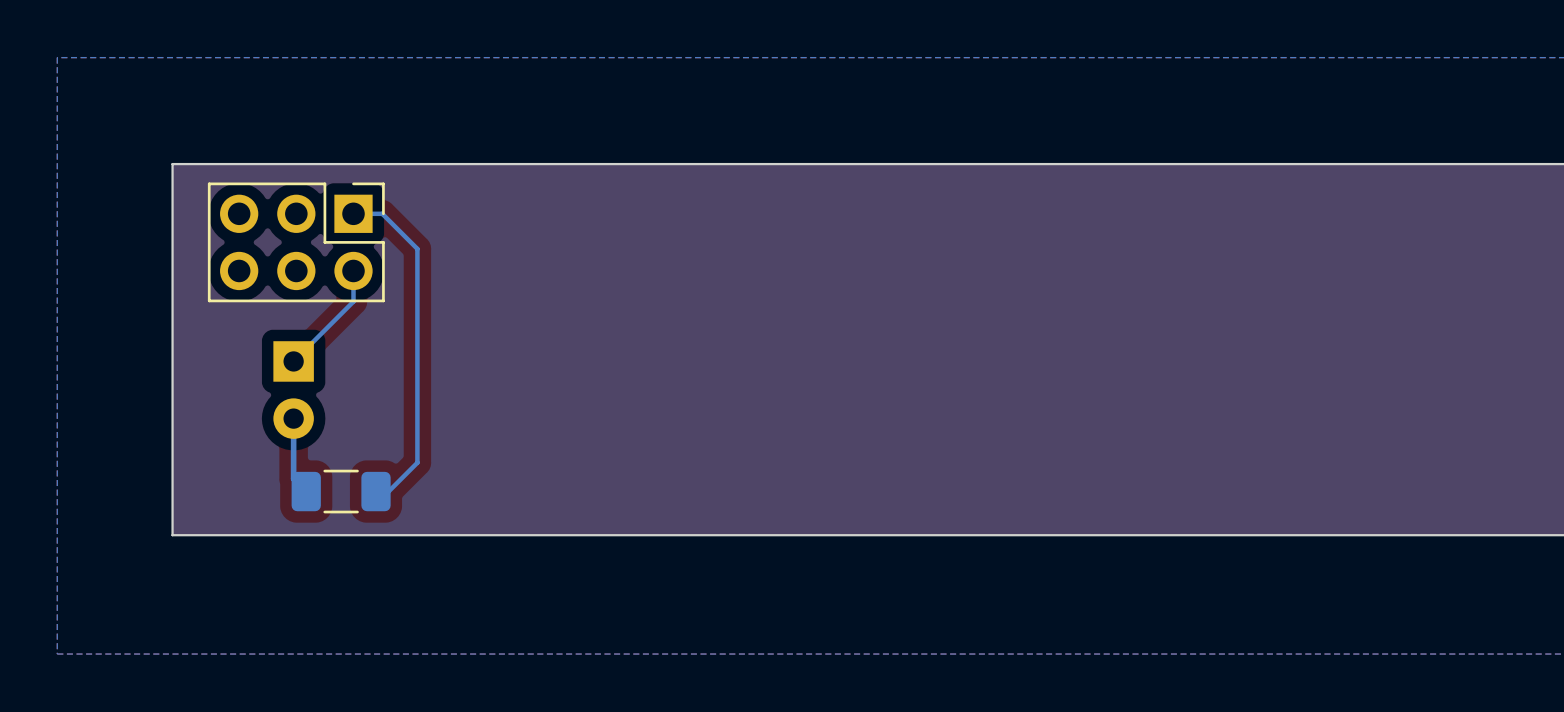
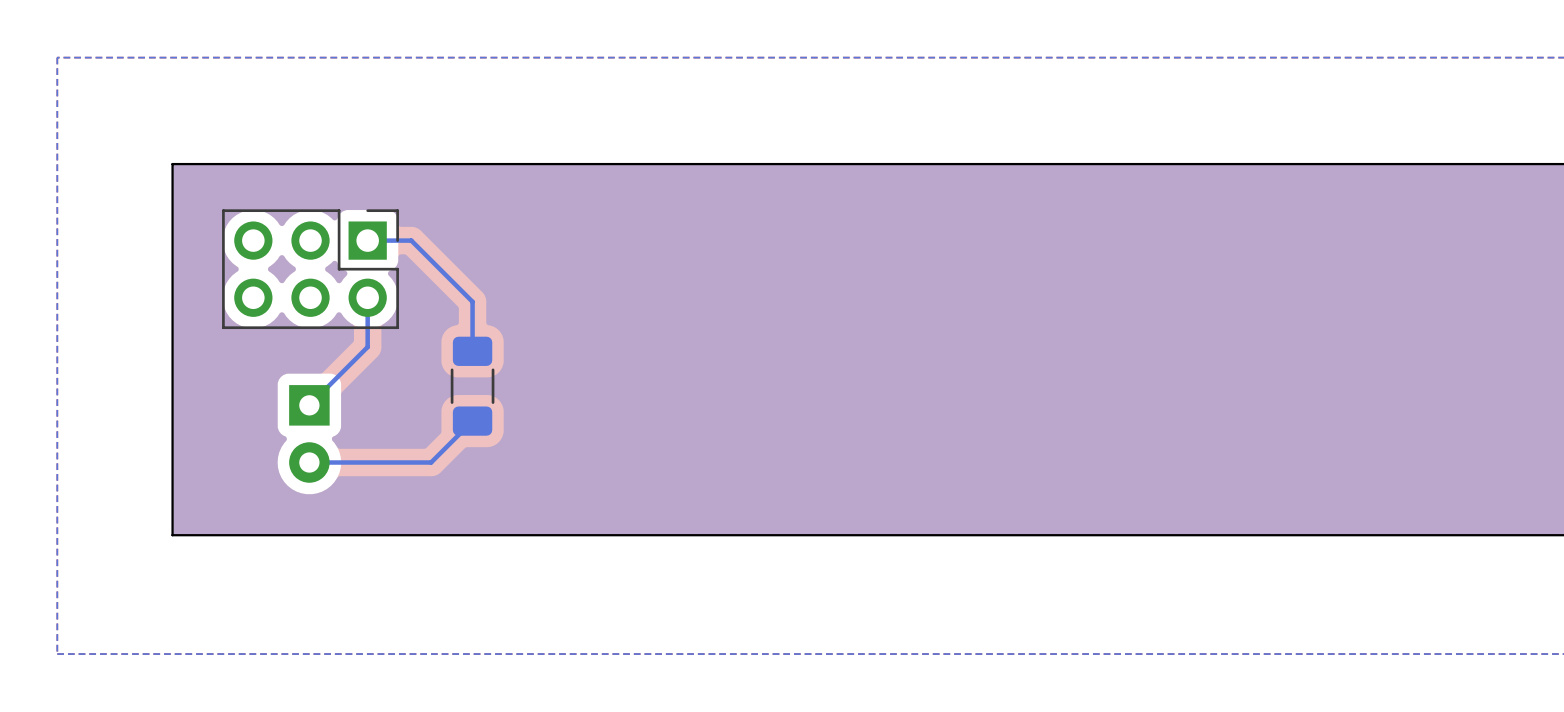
bottom track: (353, 213) (382, 213) (417, 248) (417, 462) (388, 491) (376, 491) -> none
bottom track: none -> (367, 240) (411, 240) (472, 301) (472, 351)
part position: (296, 242) -> (310, 269)
bottom track: (353, 270) (353, 301) (293, 361) -> none
bottom track: none -> (367, 297) (367, 347) (309, 405)
part position: (293, 390) -> (309, 433)
bottom track: (293, 418) (293, 478) (306, 491) -> none
bottom track: none -> (472, 421) (431, 462) (309, 462)
part rotation: 0° (341, 491) -> 90° clockwise (472, 386)
part position: (341, 491) -> (472, 386)

